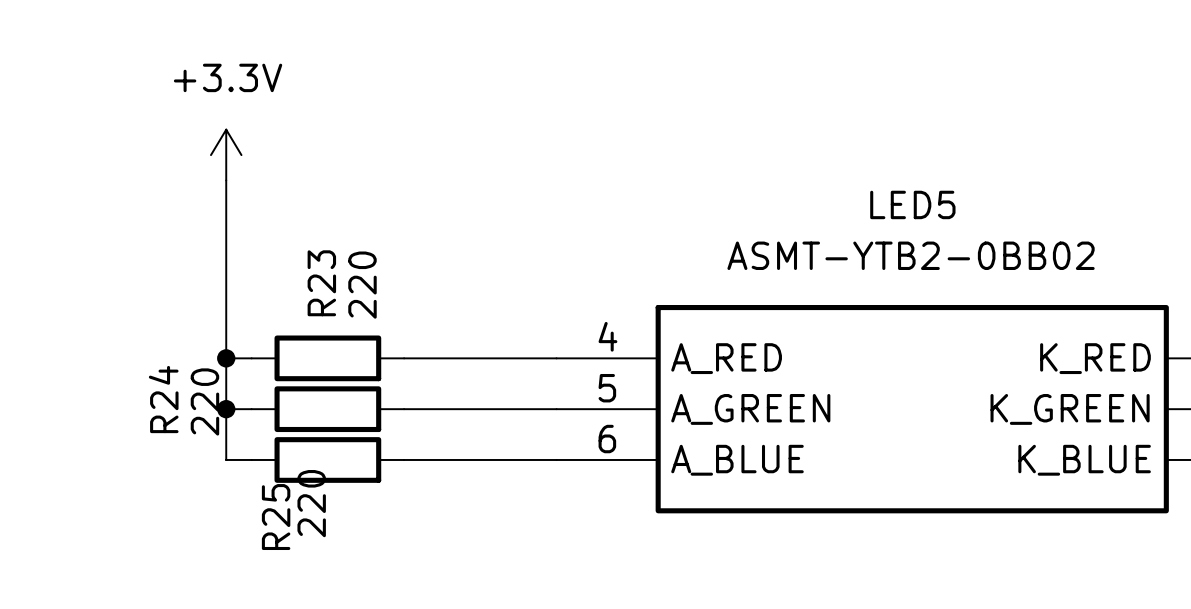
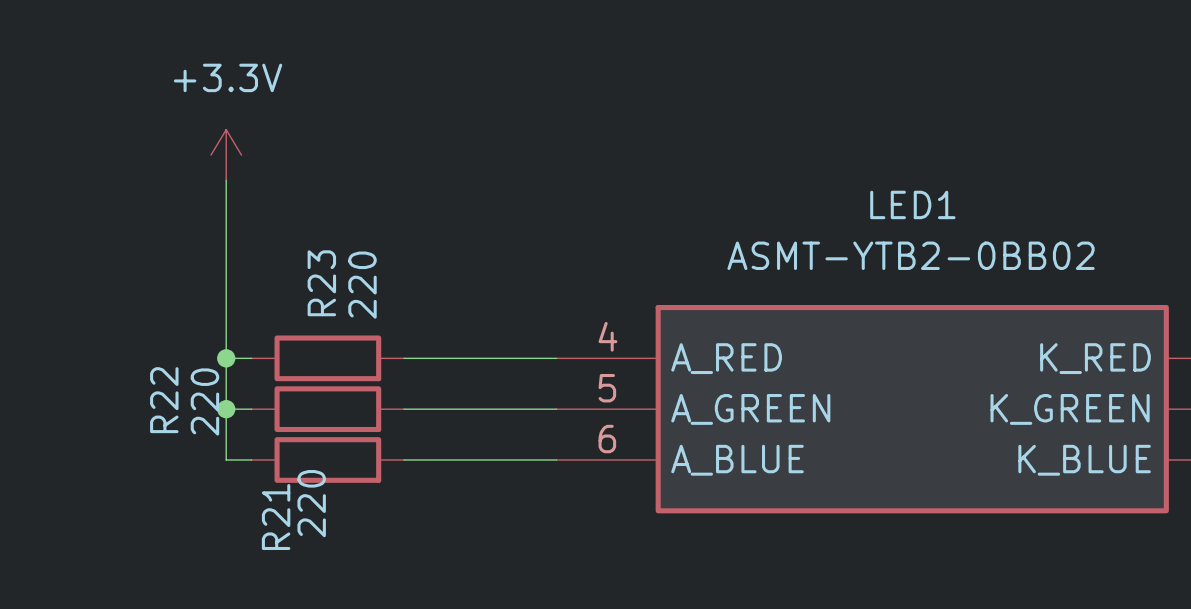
LED5 name: LED5 (912, 204) -> LED1 (912, 204)
R24 name: R24 (163, 399) -> R22 (164, 400)
R25 name: R25 (276, 517) -> R21 (276, 517)

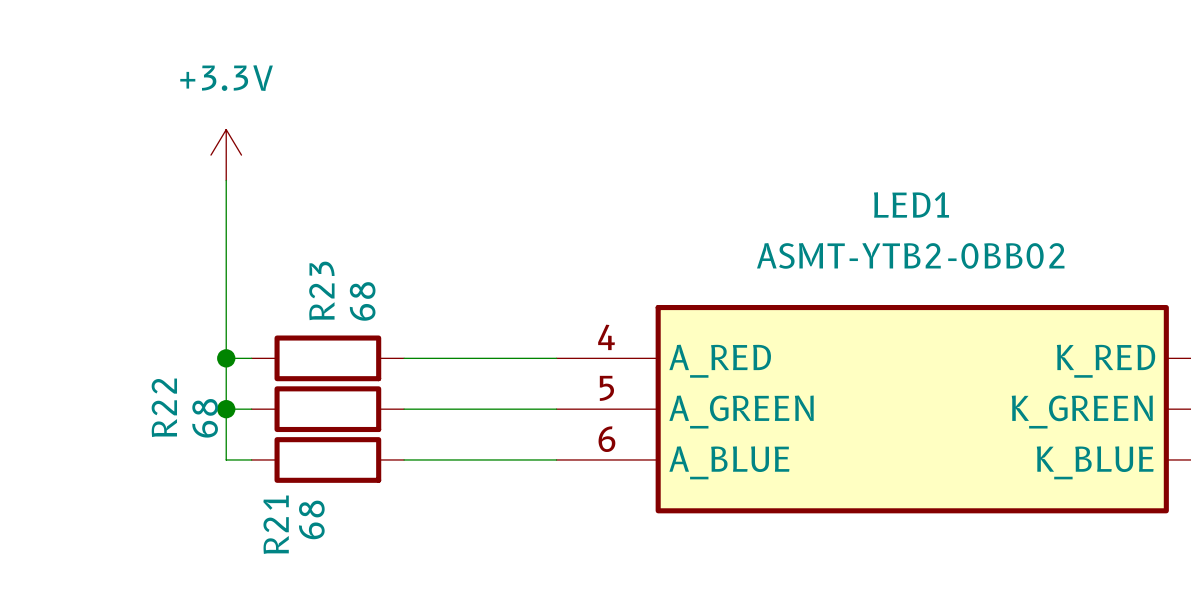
R23 value: 220 (362, 285) -> 68 (362, 301)
R22 value: 220 (204, 401) -> 68 (205, 418)
R21 value: 220 (311, 503) -> 68 (311, 519)

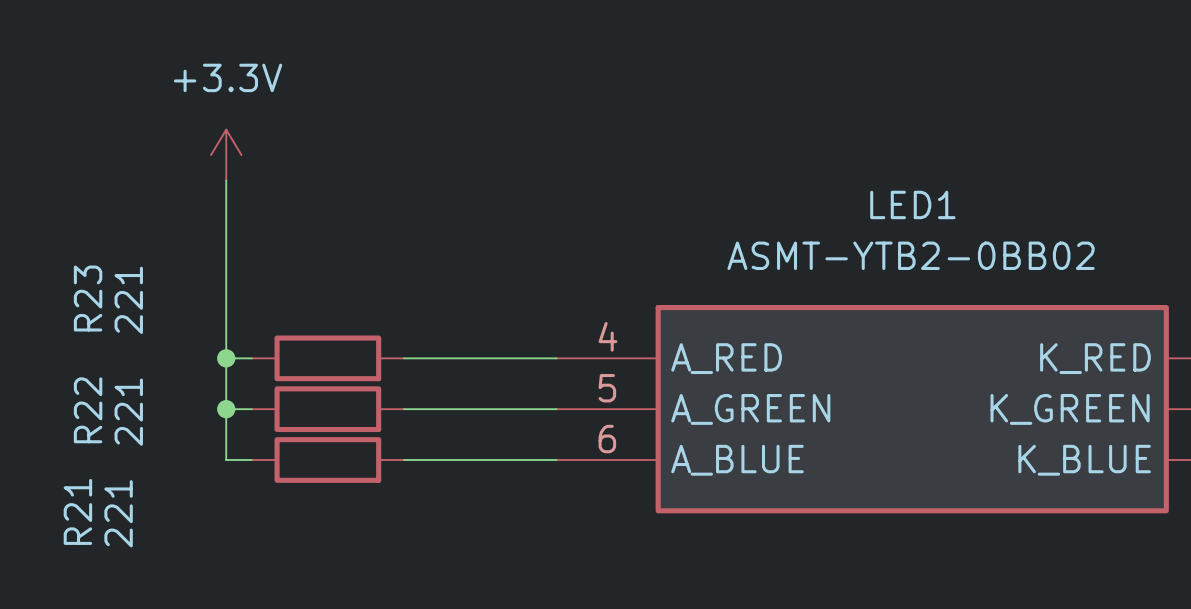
R23 name position: R23 (321, 290) -> R23 (88, 298)
R23 value: 68 (362, 301) -> 221 (128, 300)
R22 name position: R22 (164, 407) -> R22 (88, 410)
R22 value: 68 (205, 418) -> 221 (128, 412)
R21 value: 68 (311, 519) -> 221 (118, 513)
R21 name position: R21 (276, 524) -> R21 (77, 511)

